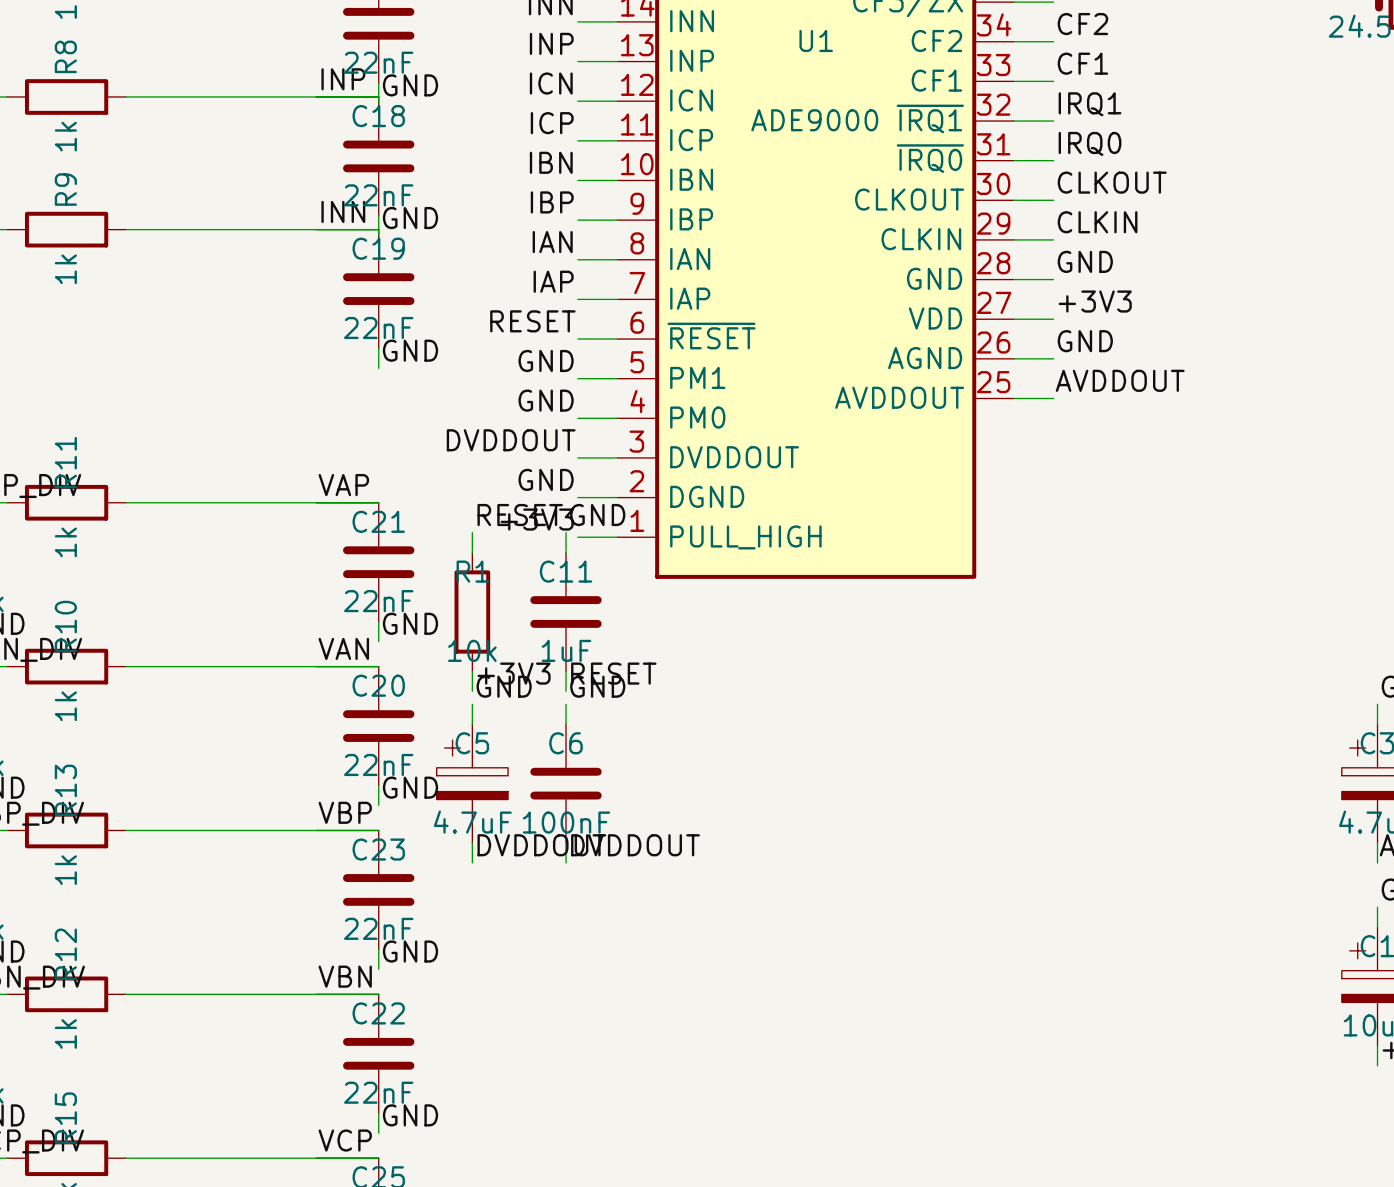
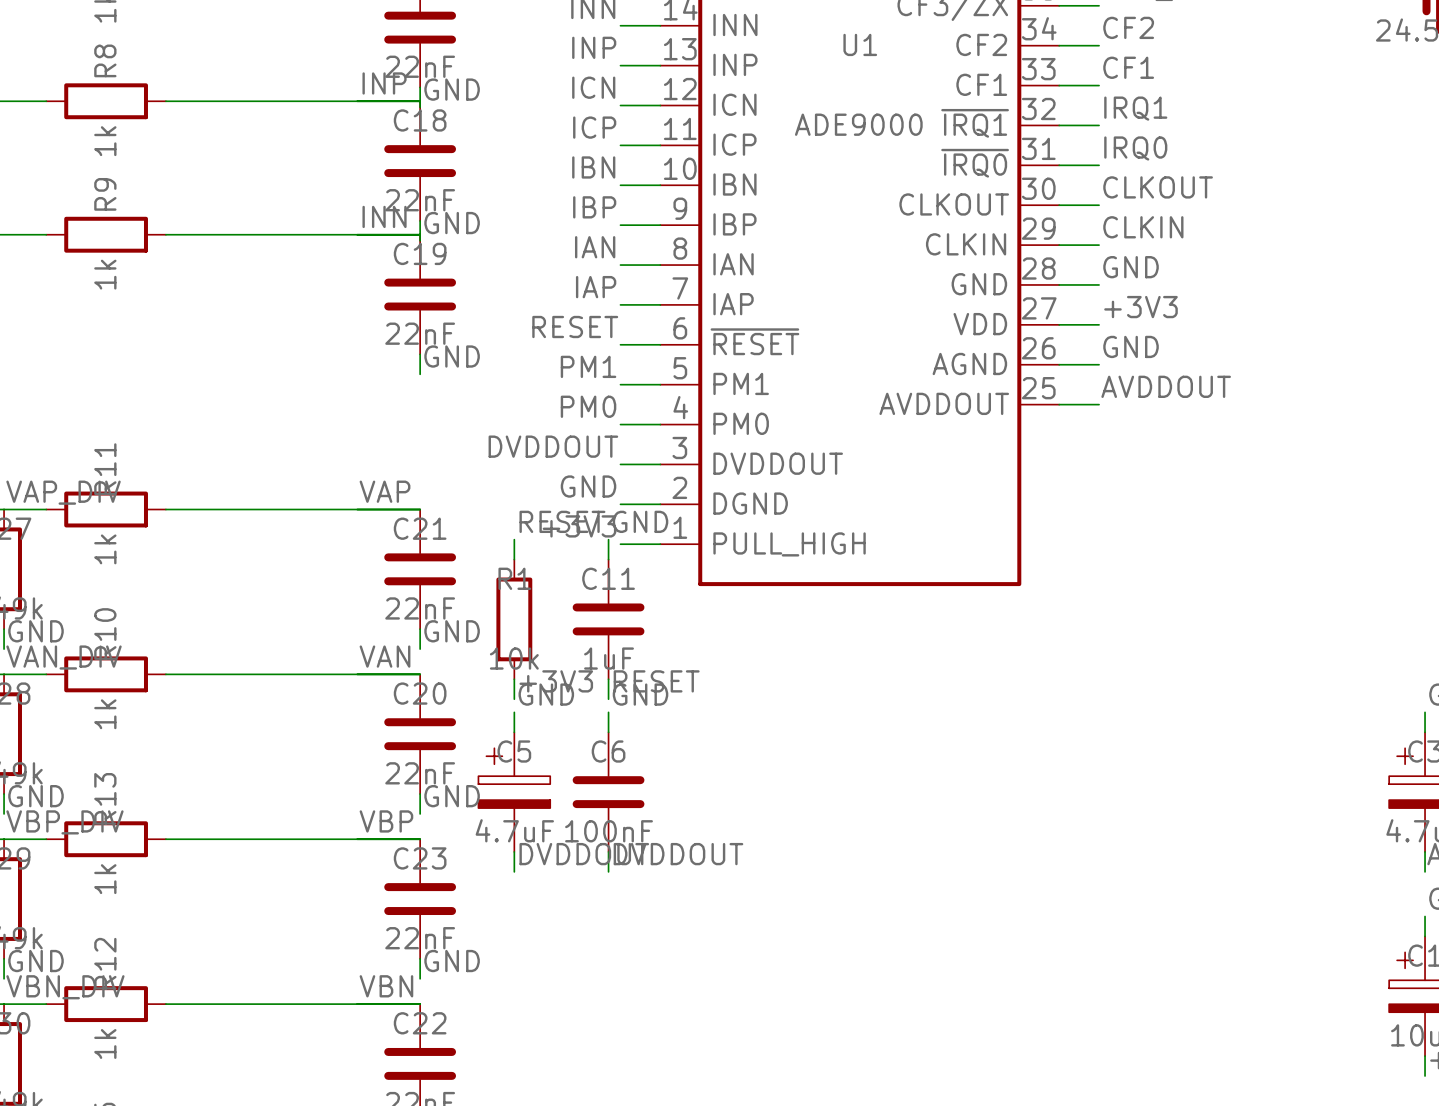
label: GND (546, 360) -> PM1 (588, 366)
label: GND (546, 400) -> PM0 (588, 406)

